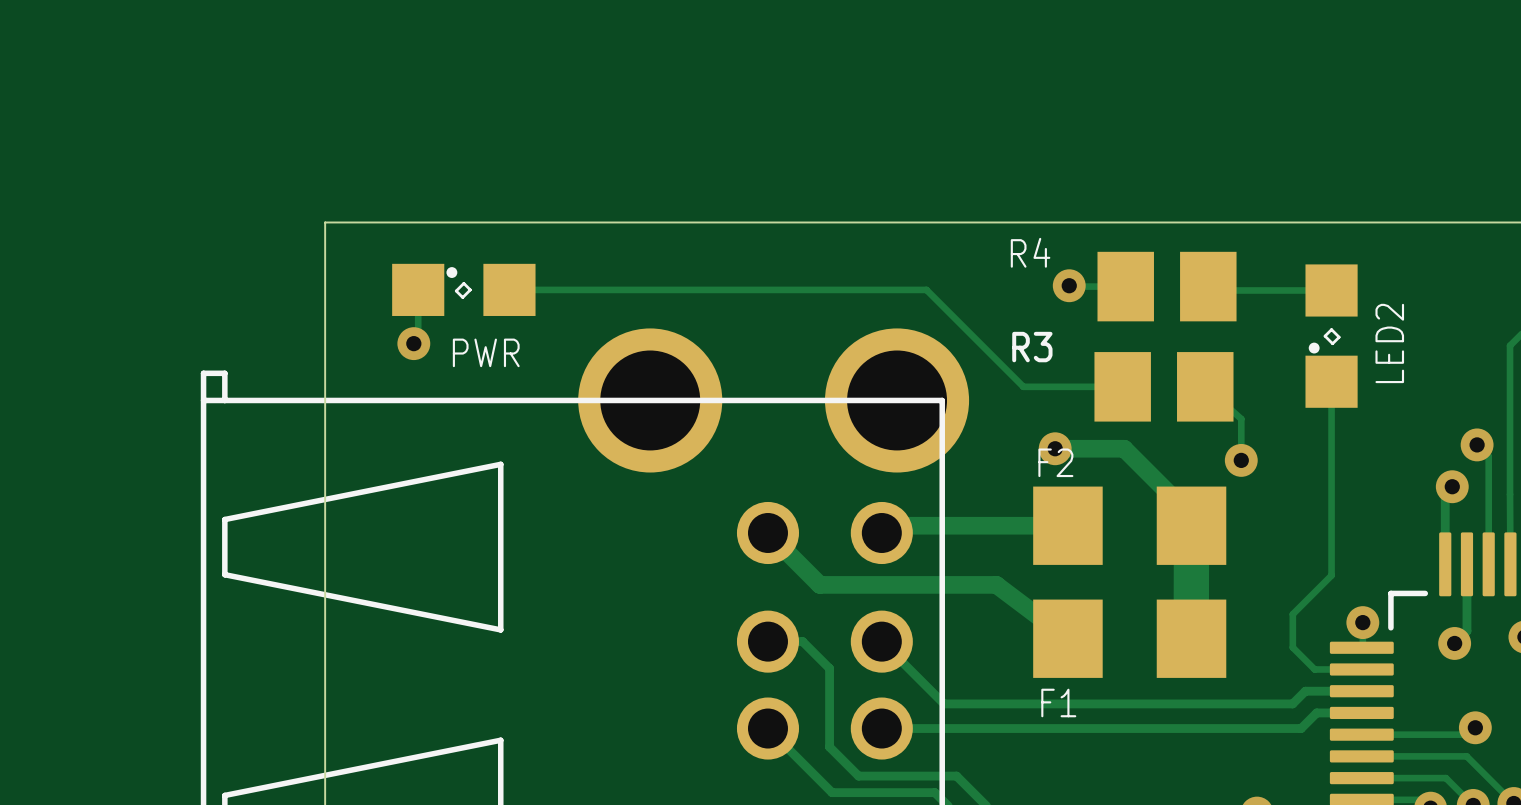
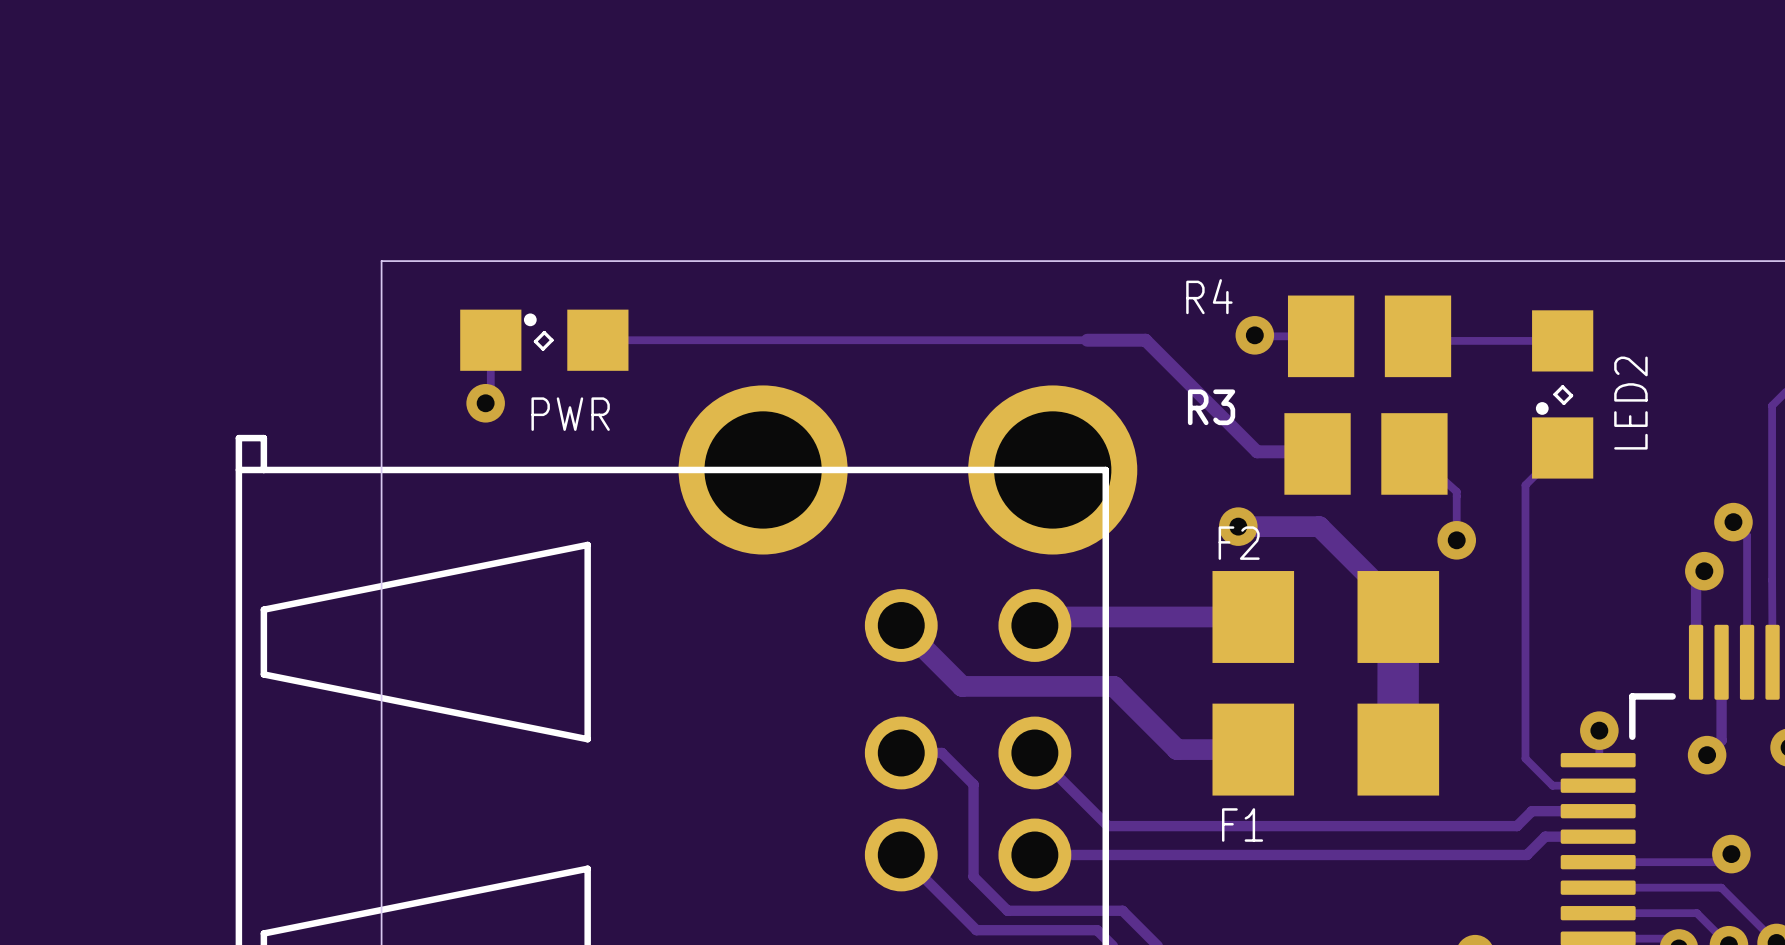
track: (926, 289) (1023, 386) (1122, 386) -> (1087, 340) (1145, 340) (1257, 451) (1315, 451) (1317, 453)
track: (1331, 381) (1331, 575) (1292, 614) (1292, 647) (1314, 669) (1322, 669) -> (1562, 447) (1525, 485) (1525, 758) (1552, 785)
track: (949, 584) (996, 584) (1067, 638) -> (1113, 686) (1177, 749) (1253, 749)

